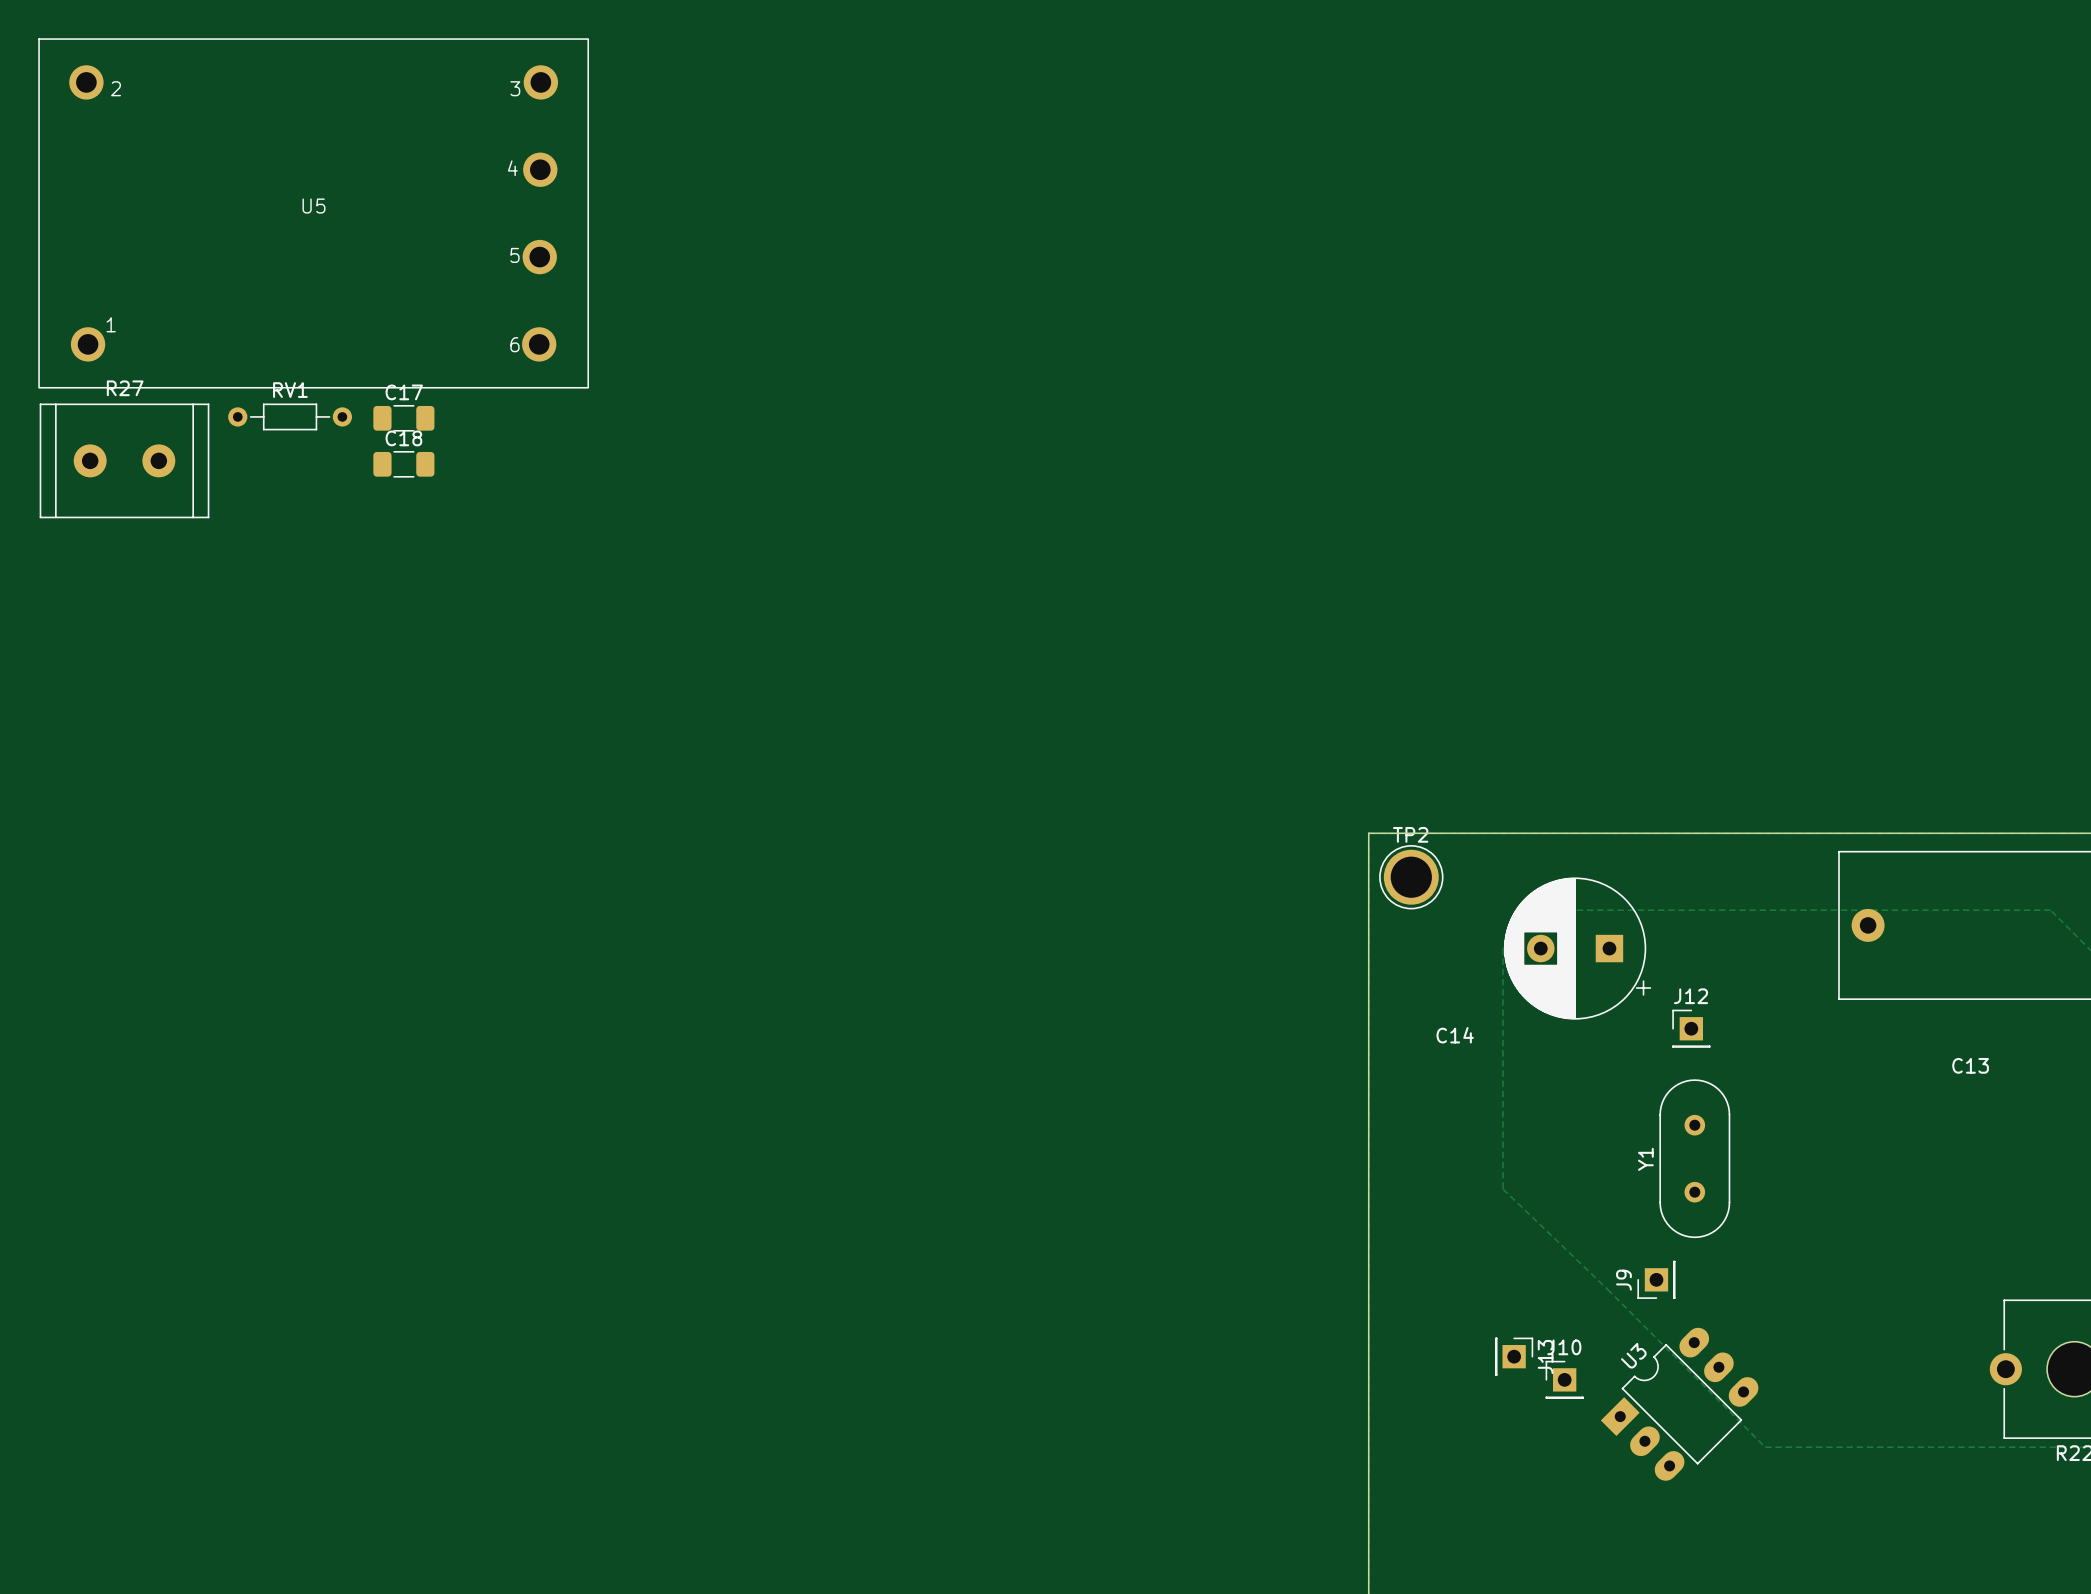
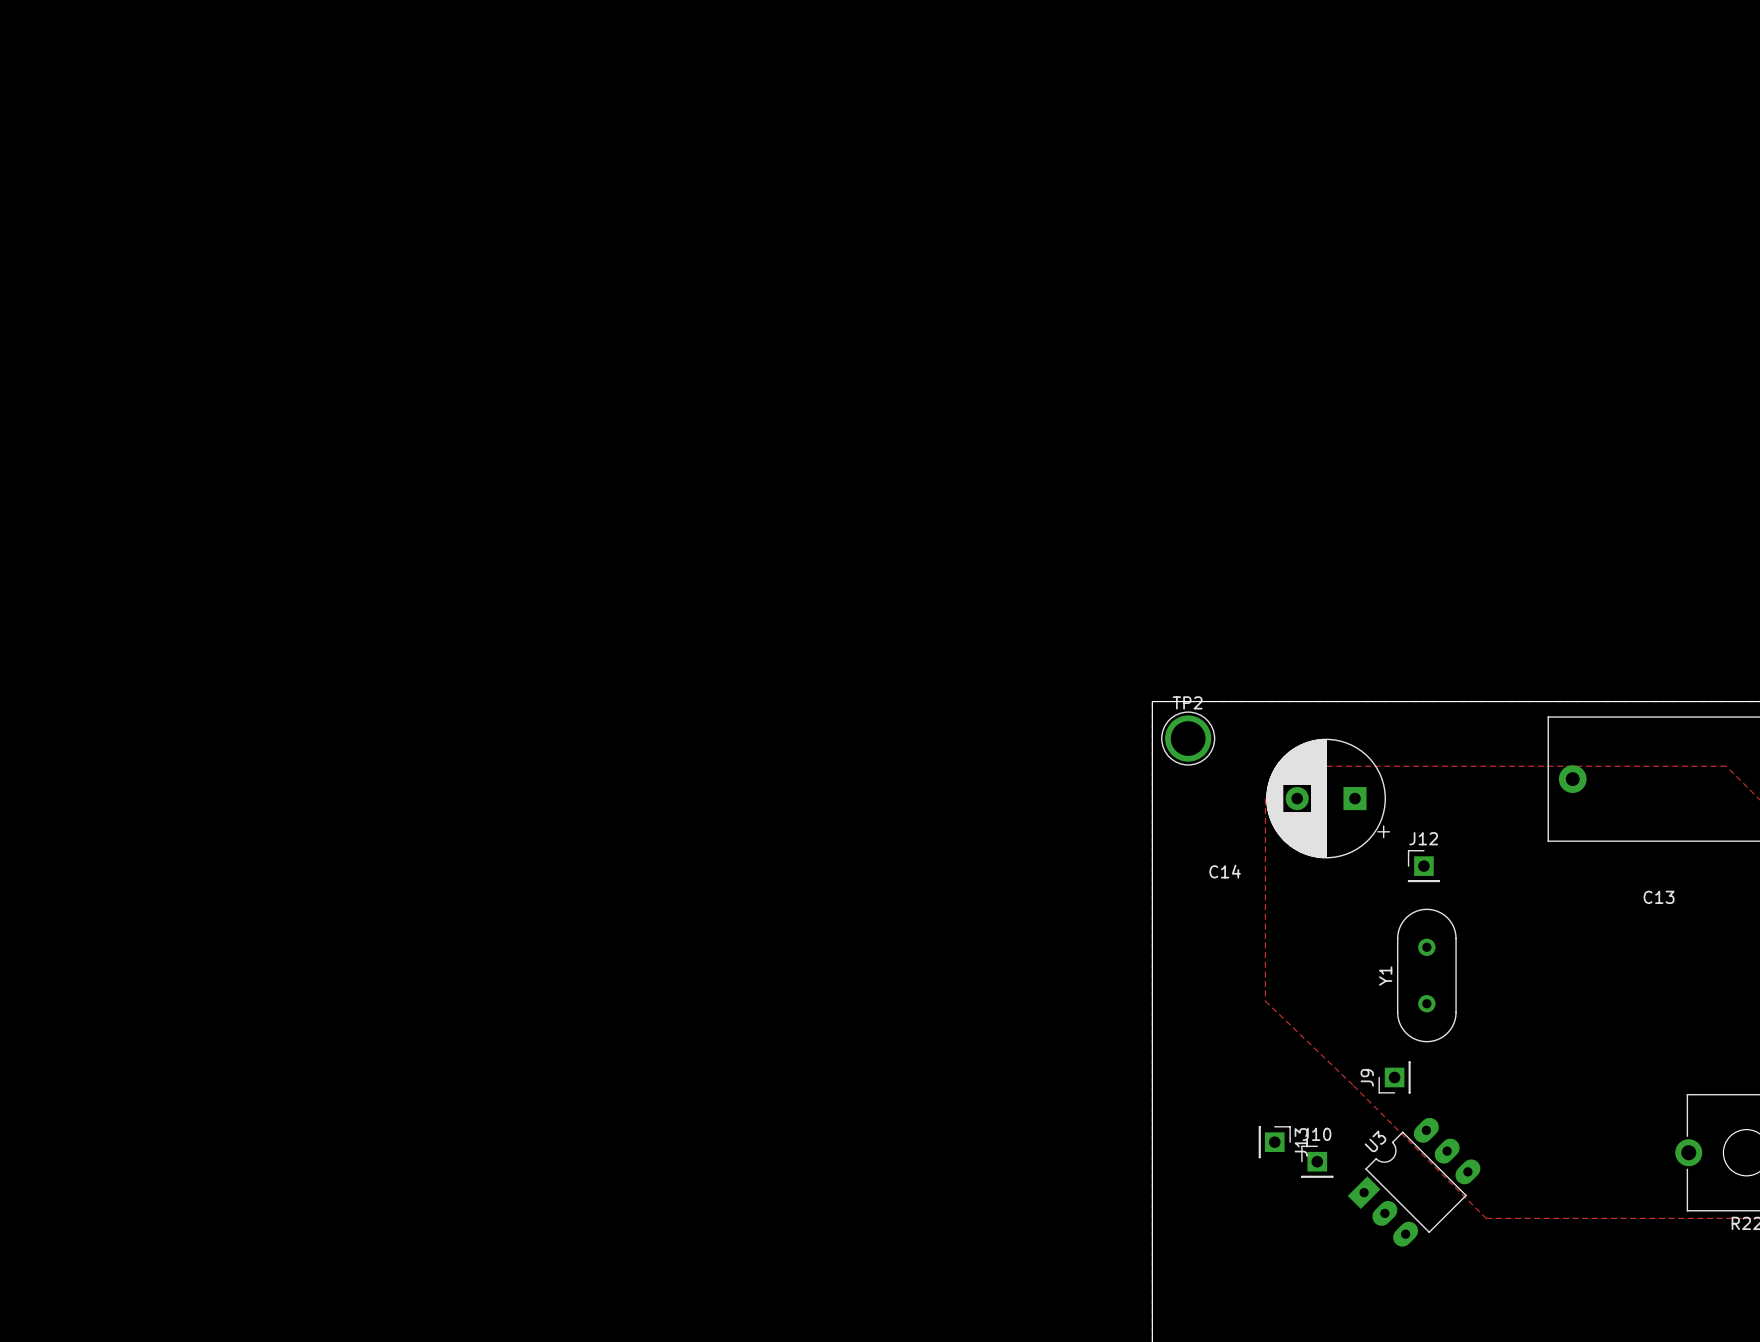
U5: (313, 213) -> none
RV1: (290, 416) -> none
C17: (403, 418) -> none
R27: (124, 460) -> none
C18: (403, 464) -> none

